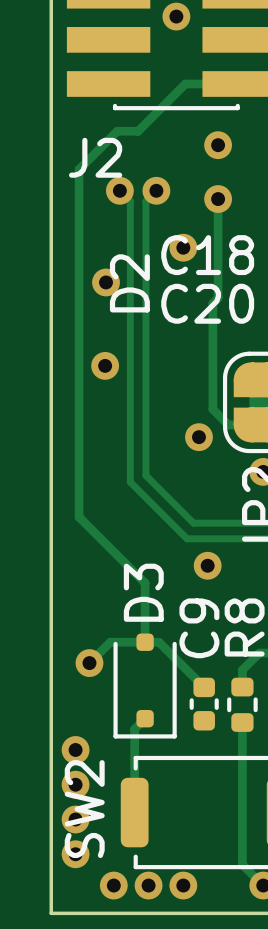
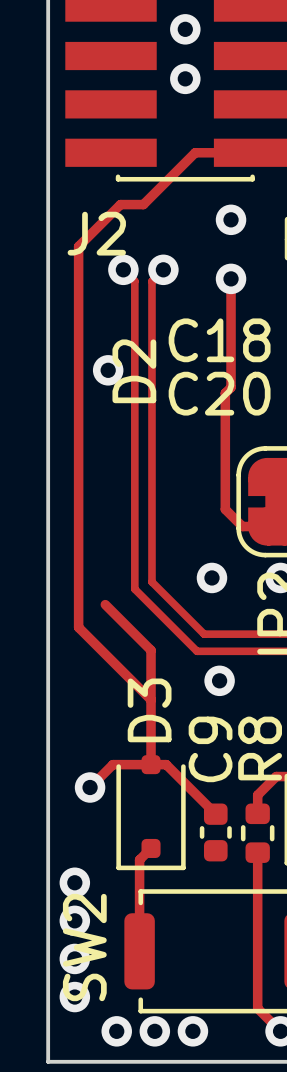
via: (183, 247) -> none
via: (105, 365) -> none
via position: (198, 437) -> (211, 577)
track: none -> (105, 604) (151, 650) (151, 699)

